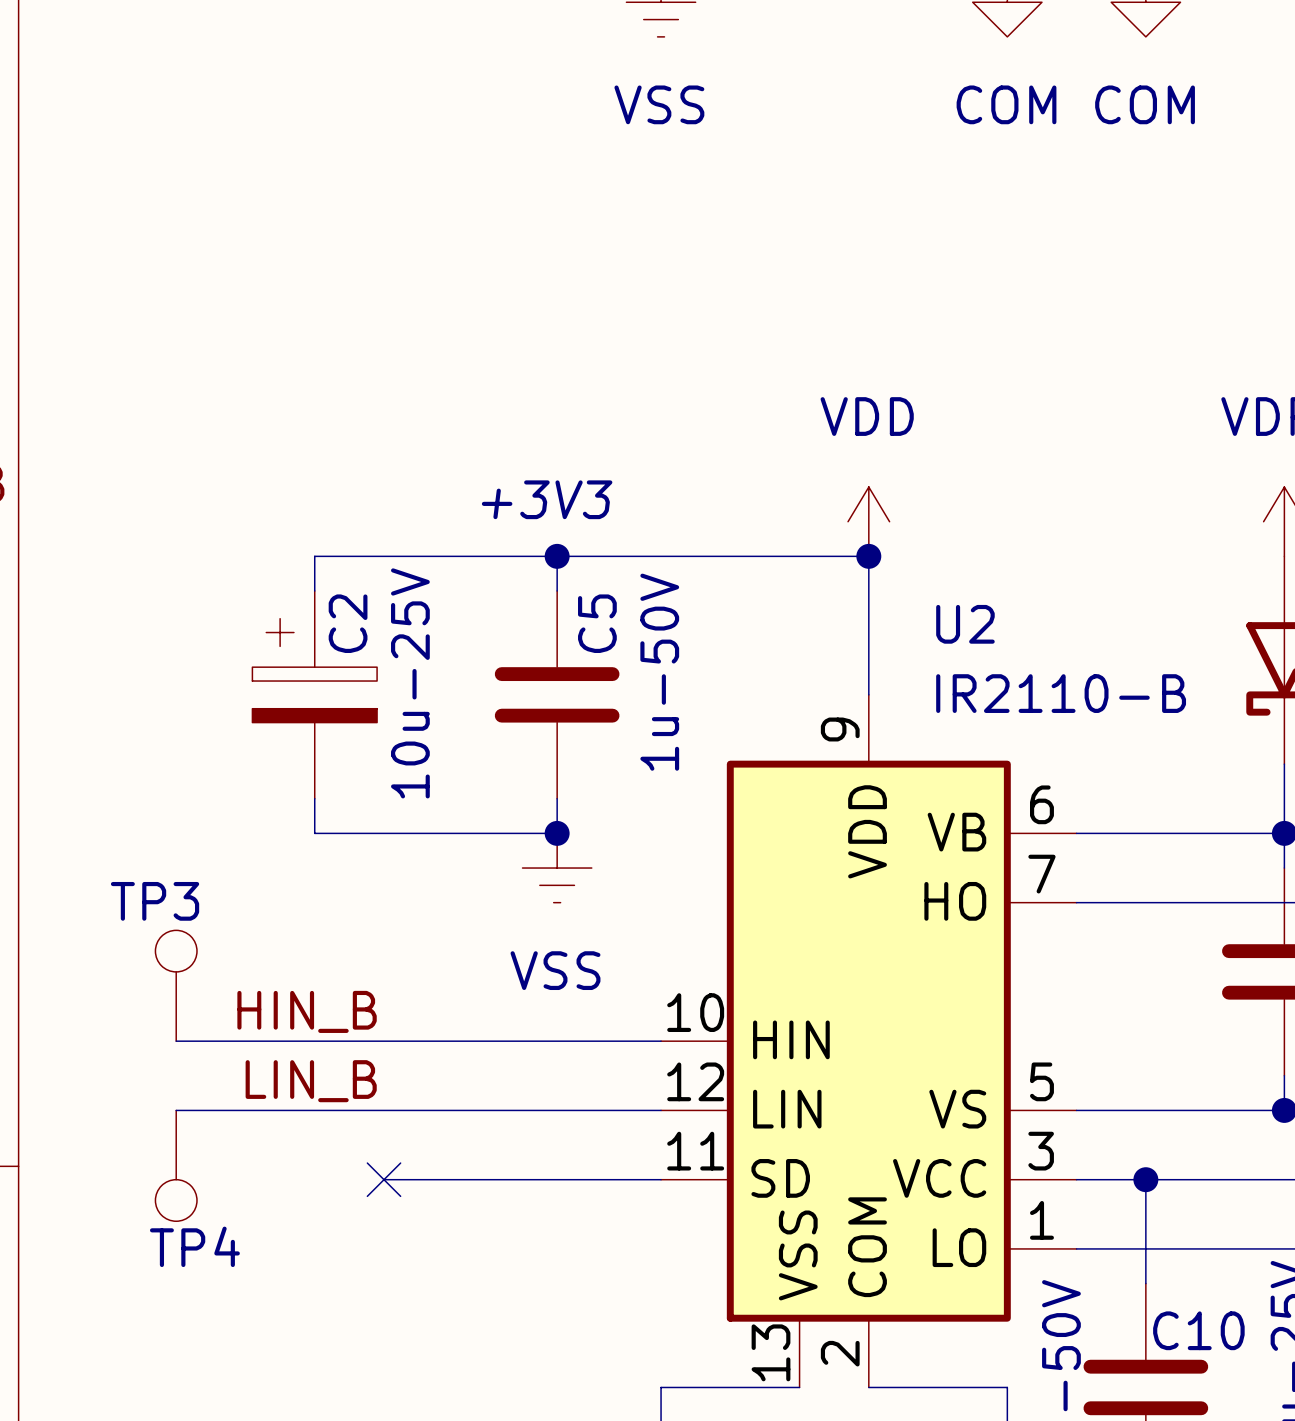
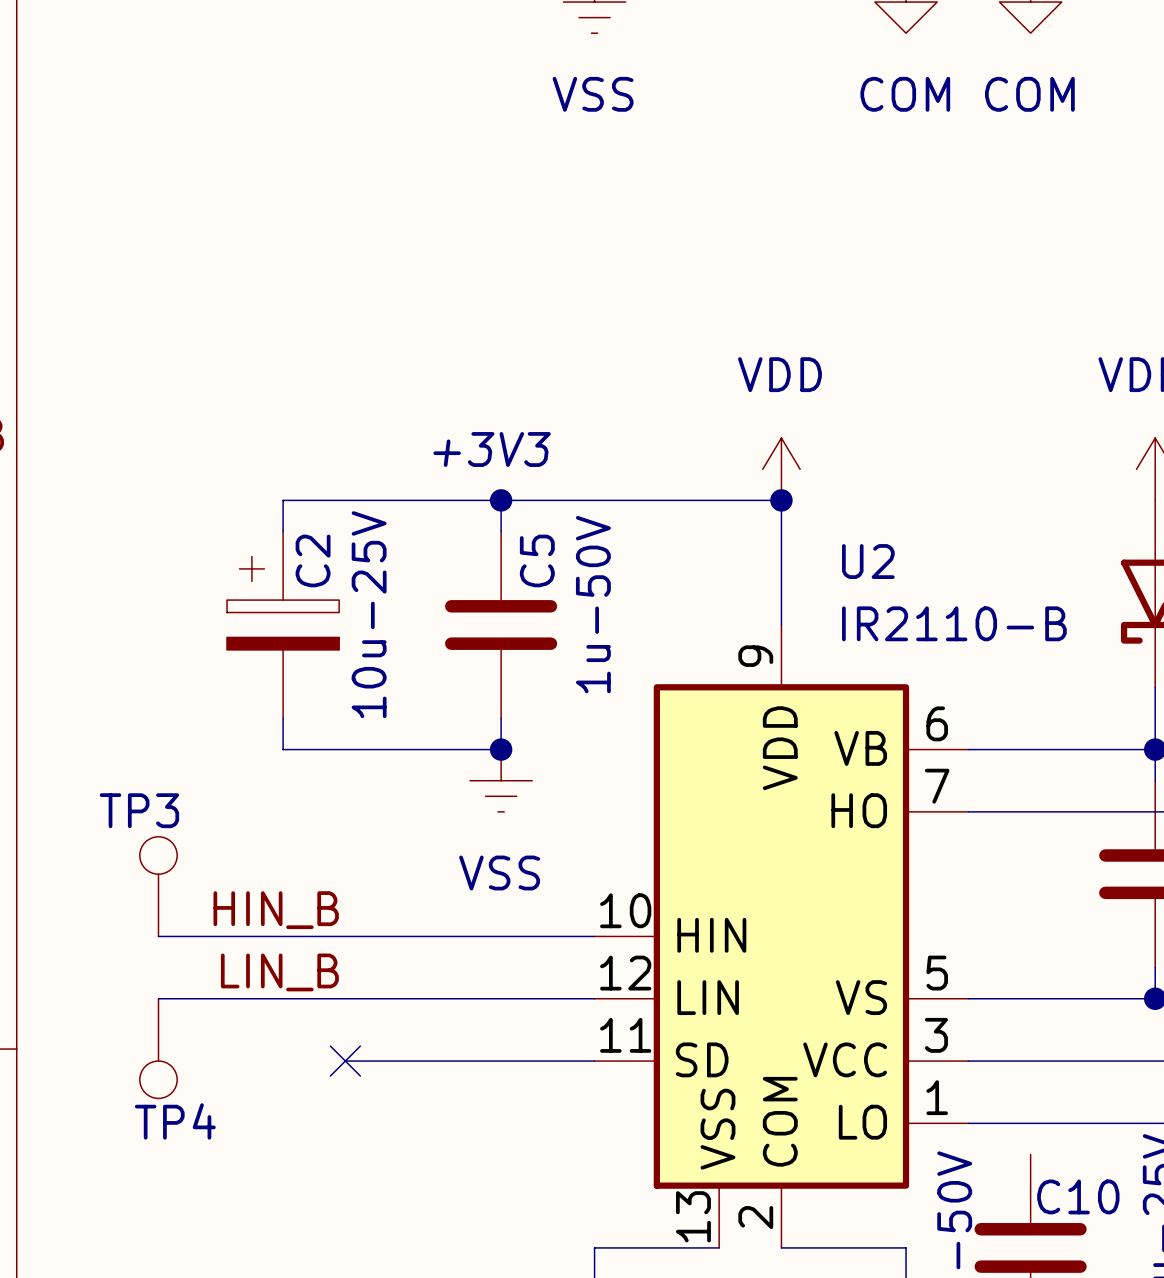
wire: (1145, 1179) (1145, 1283) -> none
junction: (1145, 1179) -> none

